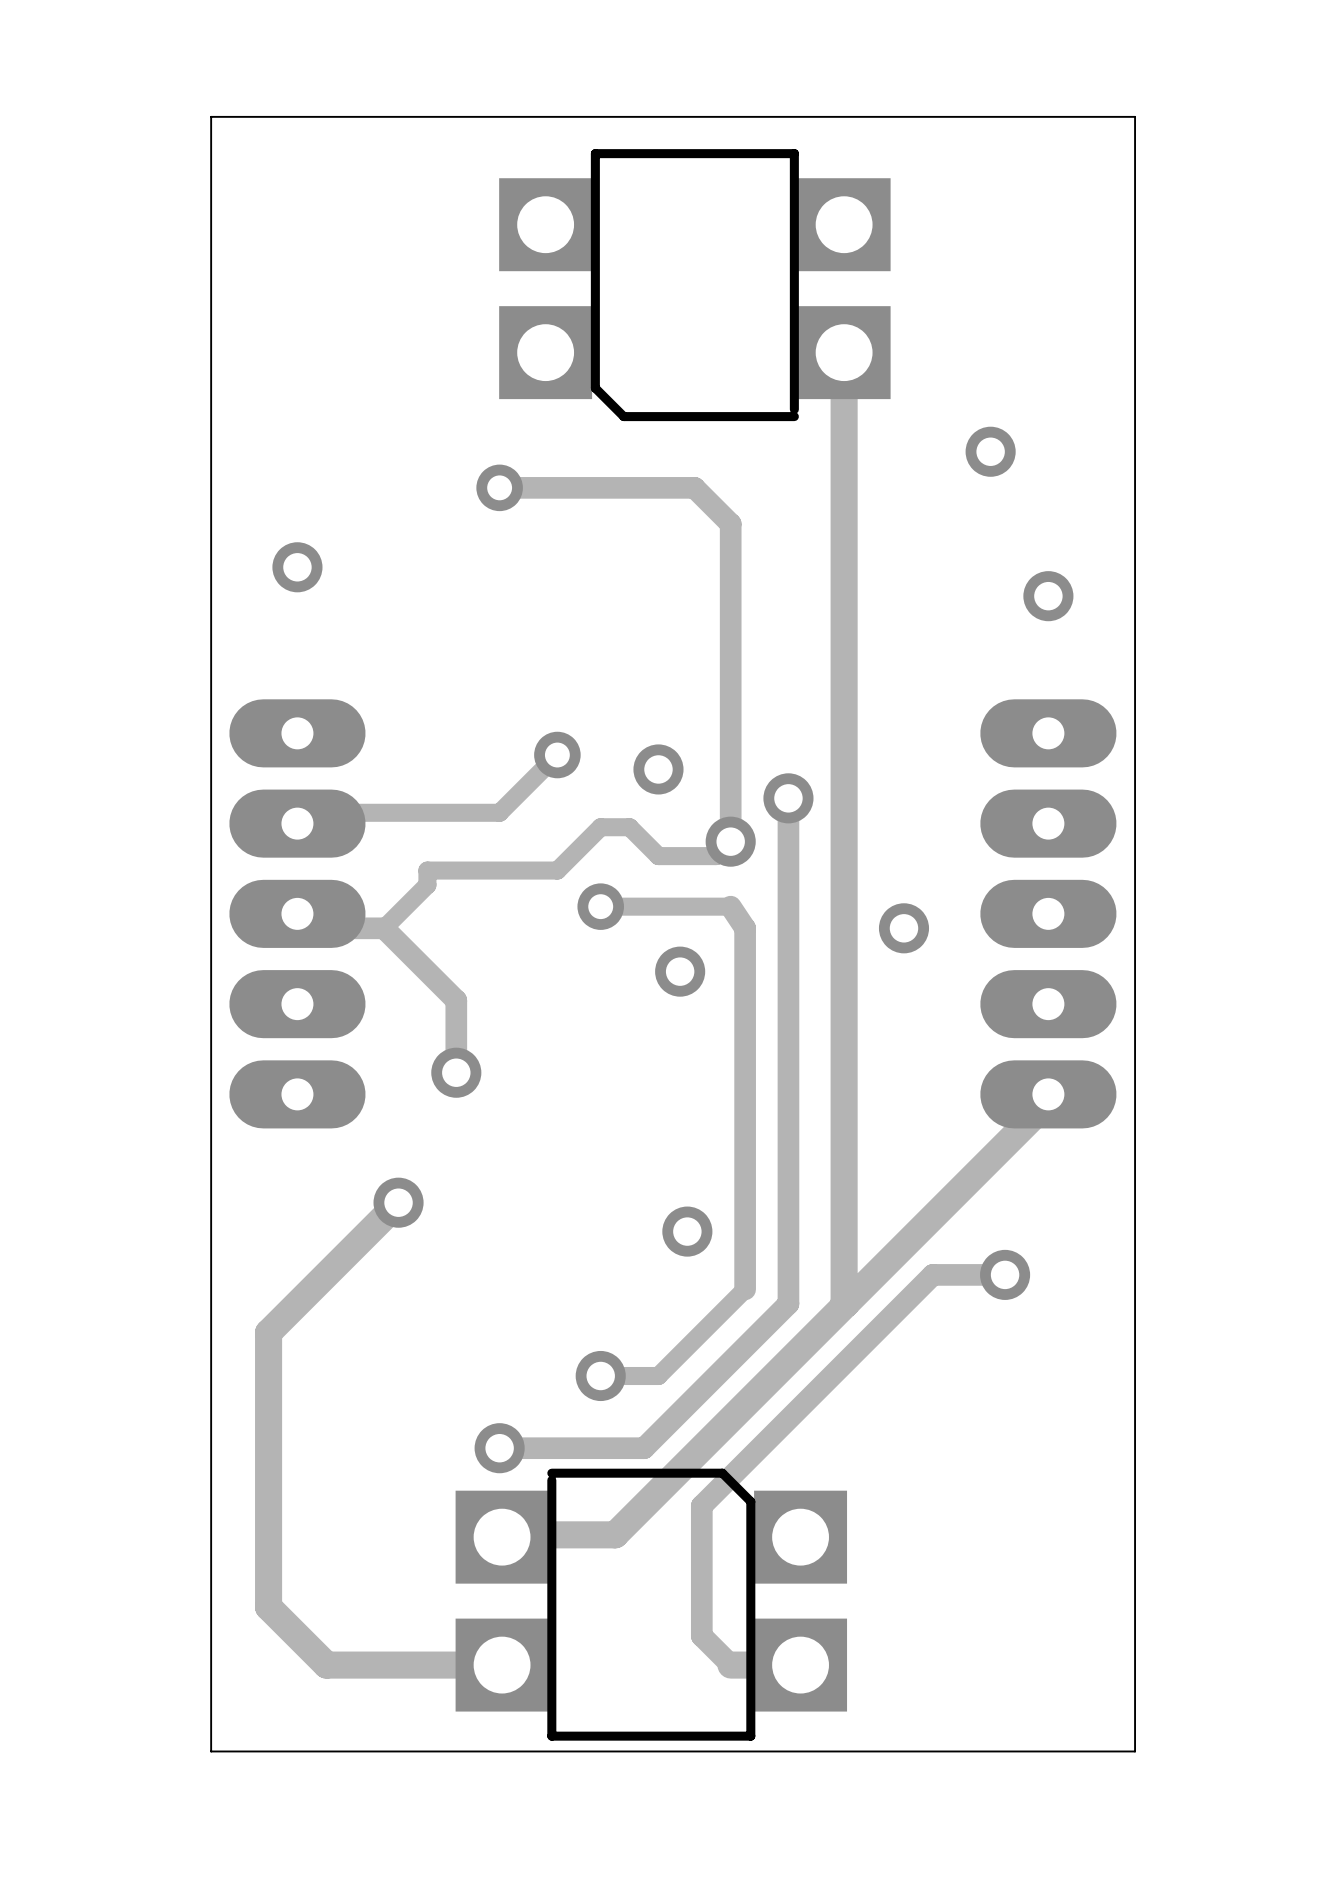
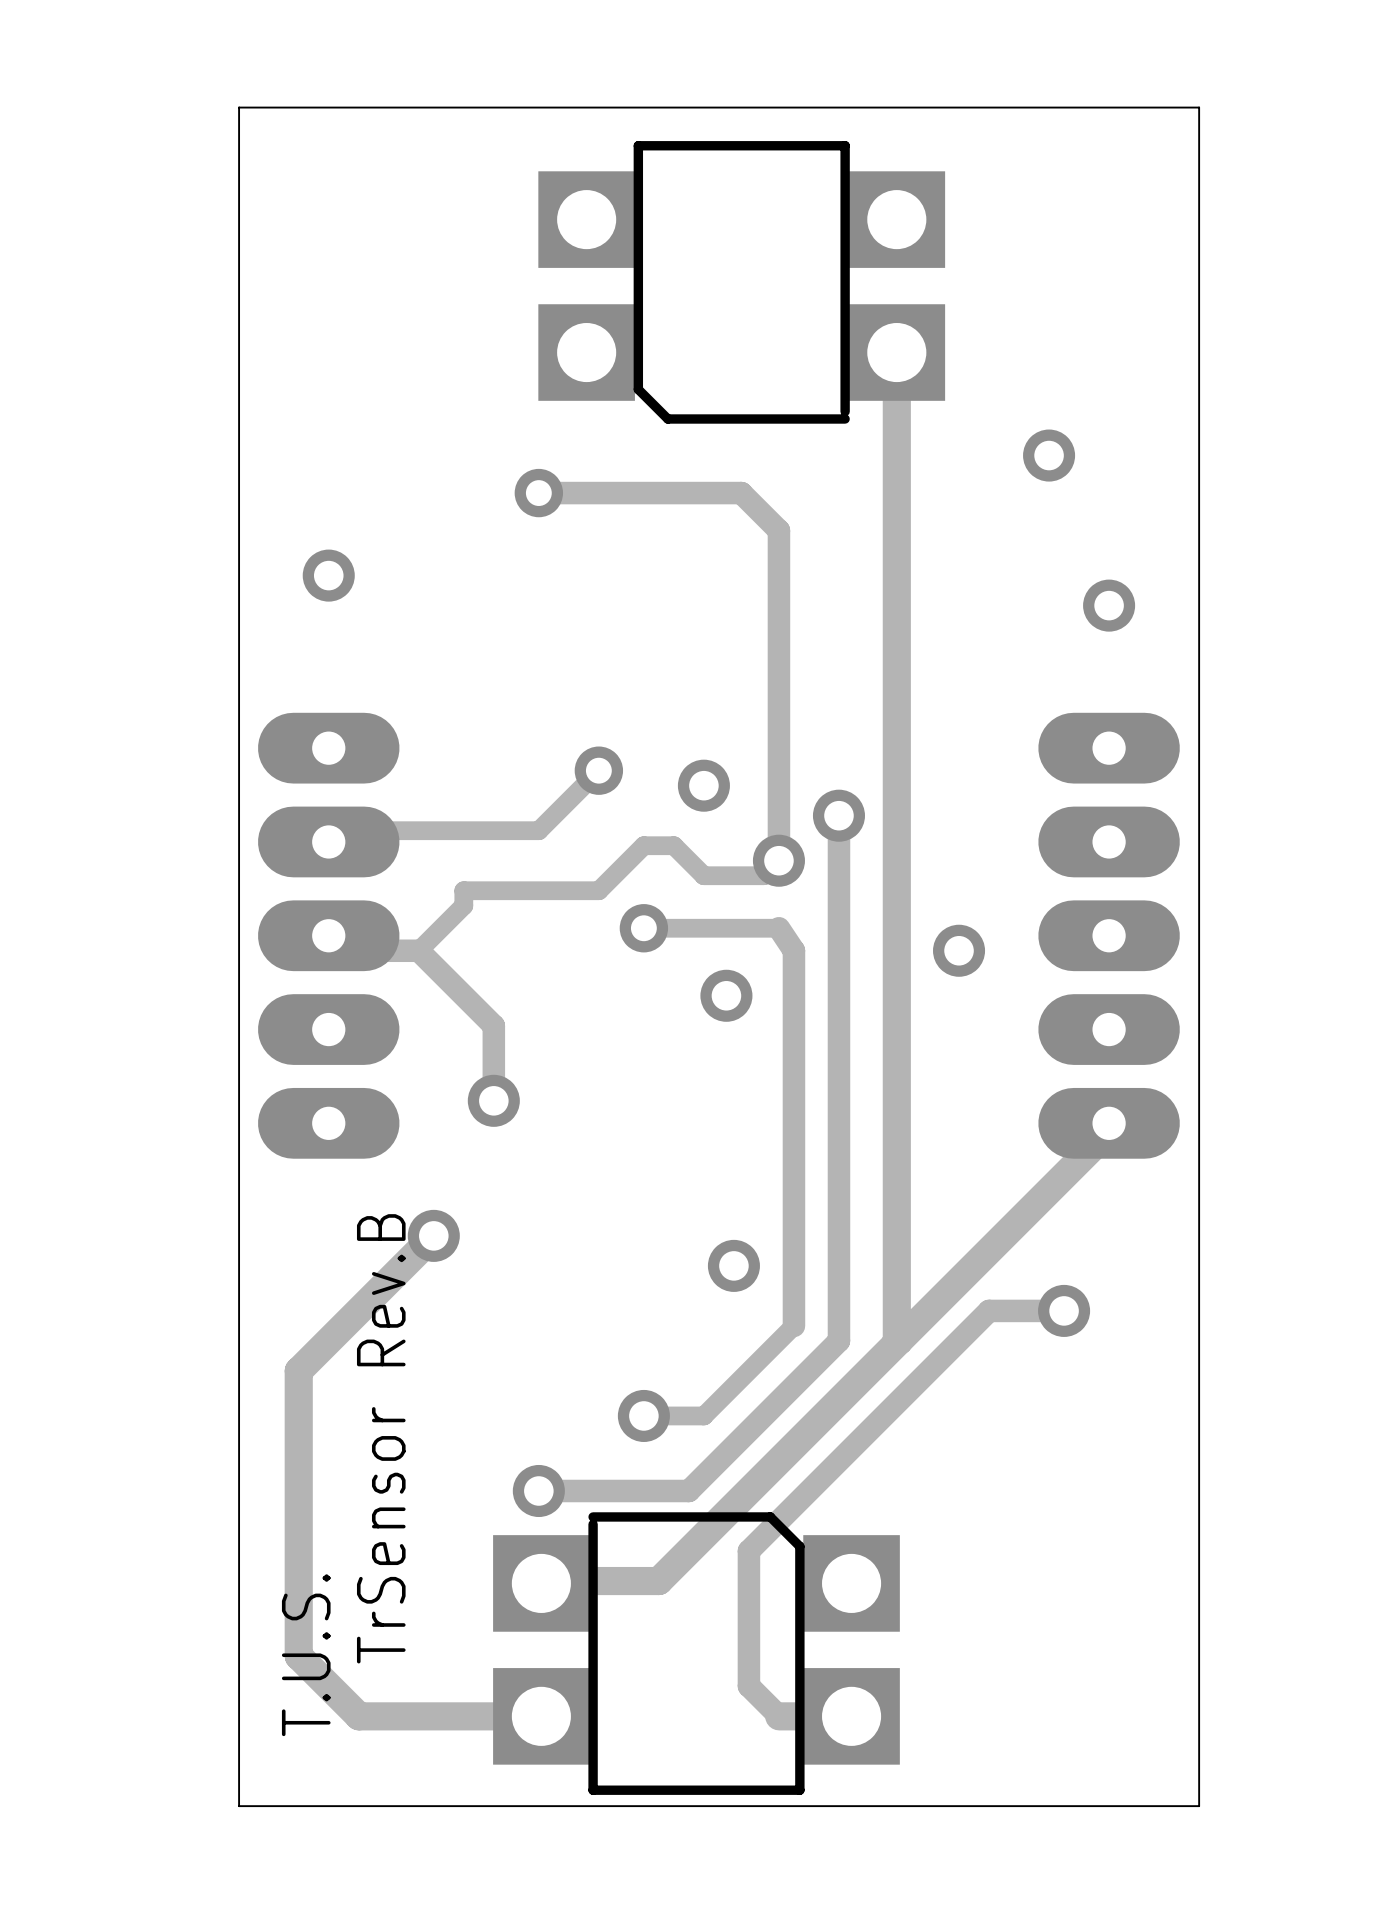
text: none -> TrSensor Rev.B (381, 1438)
text: none -> T.U.S. (306, 1655)

